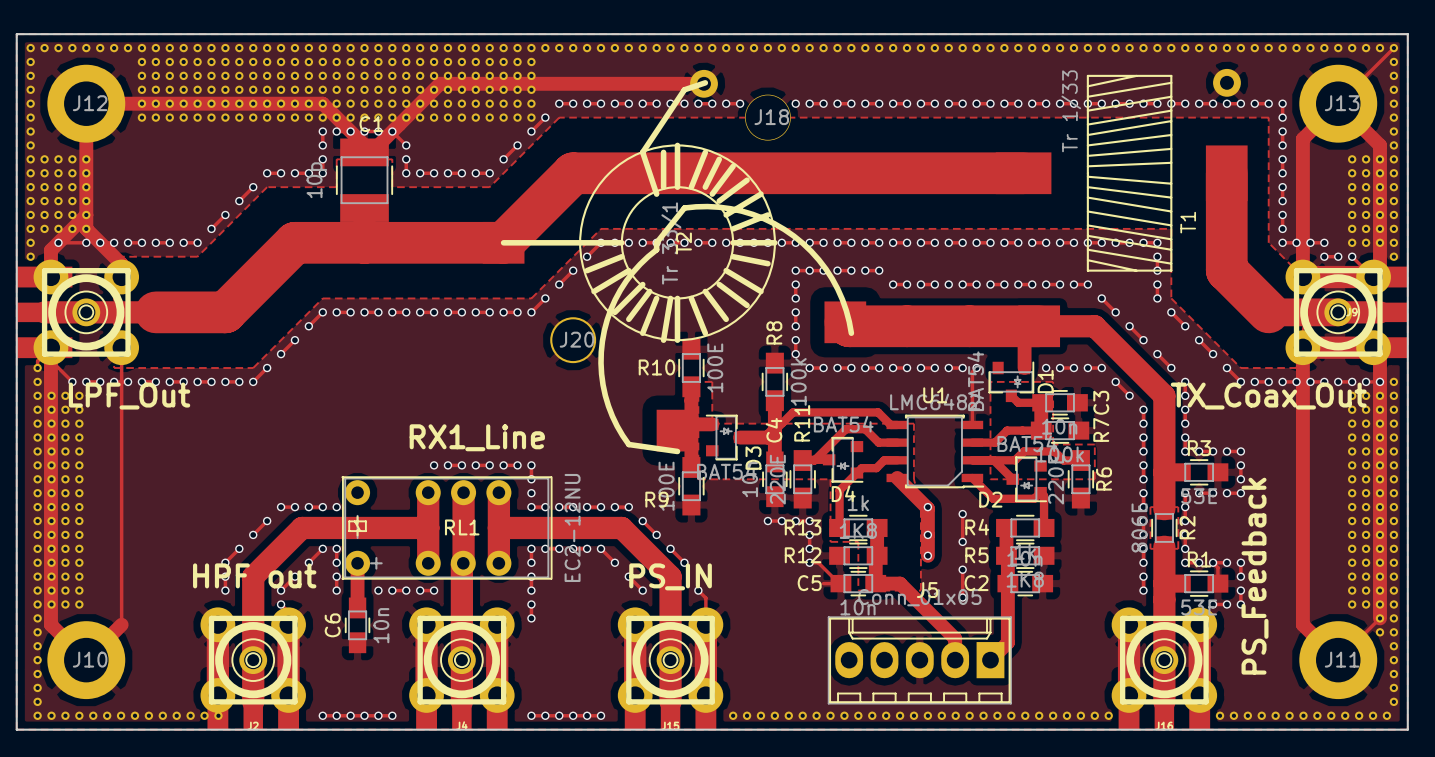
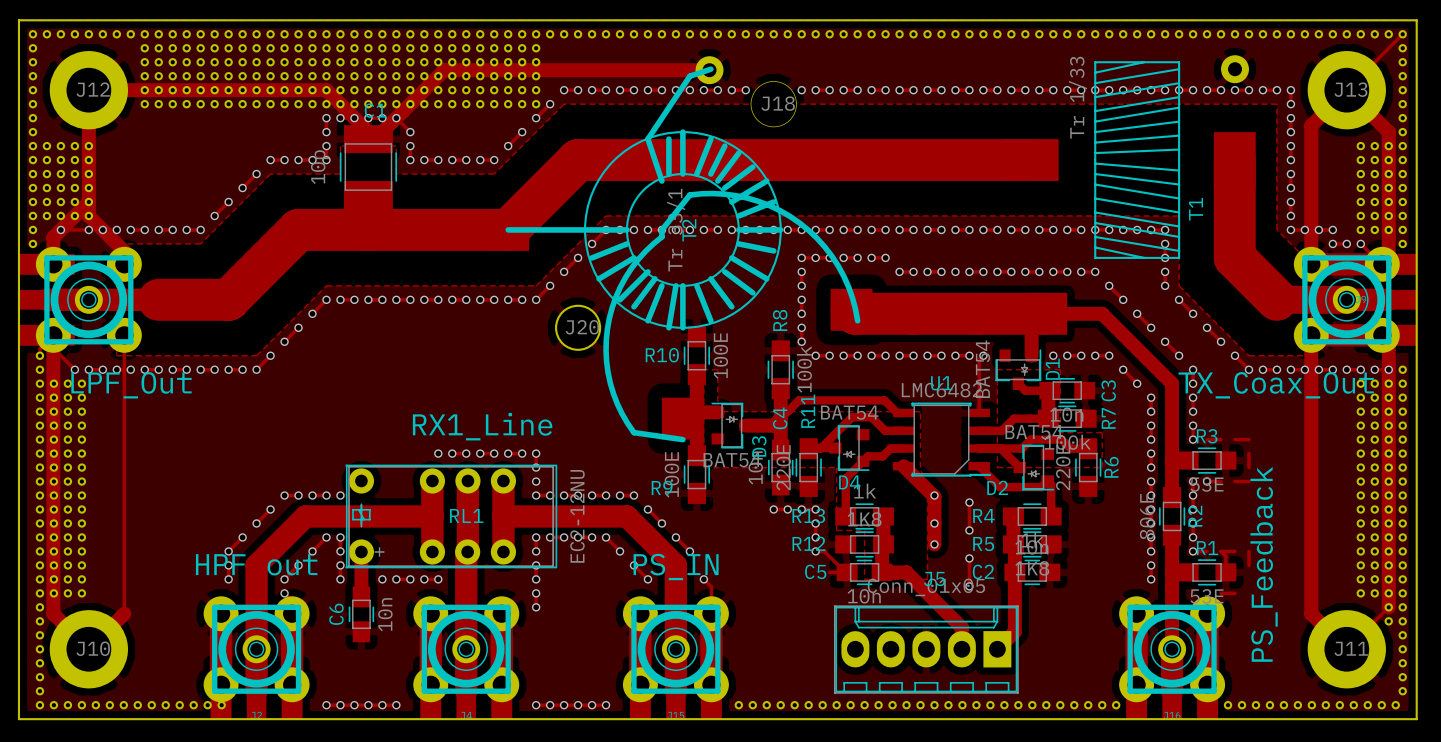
track width: thick (1039, 326) (1094, 326) (1164, 395) (1164, 509) -> thin (1046, 313) (1102, 313) (1172, 383) (1172, 497)
via: (1199, 451) -> none
via: (1213, 451) -> none
via: (1226, 451) -> none
via: (1240, 451) -> none
via: (1240, 465) -> none
via: (1240, 479) -> none
via: (1213, 493) -> none
via: (1226, 493) -> none
via: (1240, 493) -> none
zone outline: (1150, 507) (1150, 548) (1178, 548) (1178, 507) (1150, 507) -> none
track width: thick (1164, 546) (1164, 660) -> thin (1172, 535) (1172, 649)
via: (1199, 562) -> none
via: (1213, 562) -> none
via: (1226, 562) -> none
via: (1240, 562) -> none
via: (1240, 576) -> none
track: (1240, 590) (1240, 604) -> none
via: (1240, 590) -> none
via: (1213, 604) -> none
via: (1226, 604) -> none
via: (1240, 604) -> none

